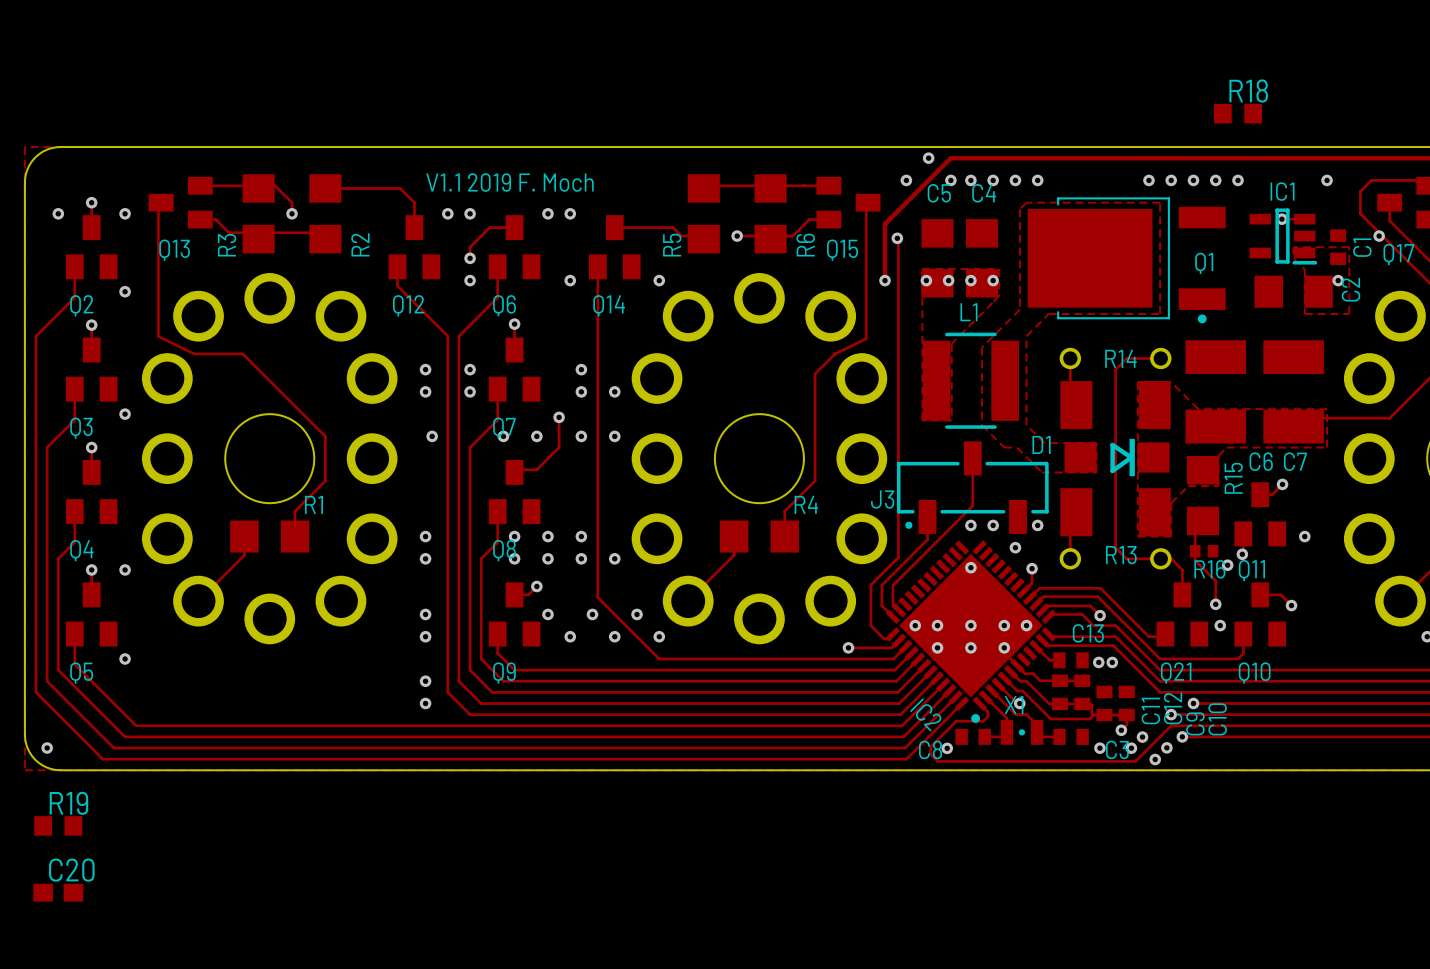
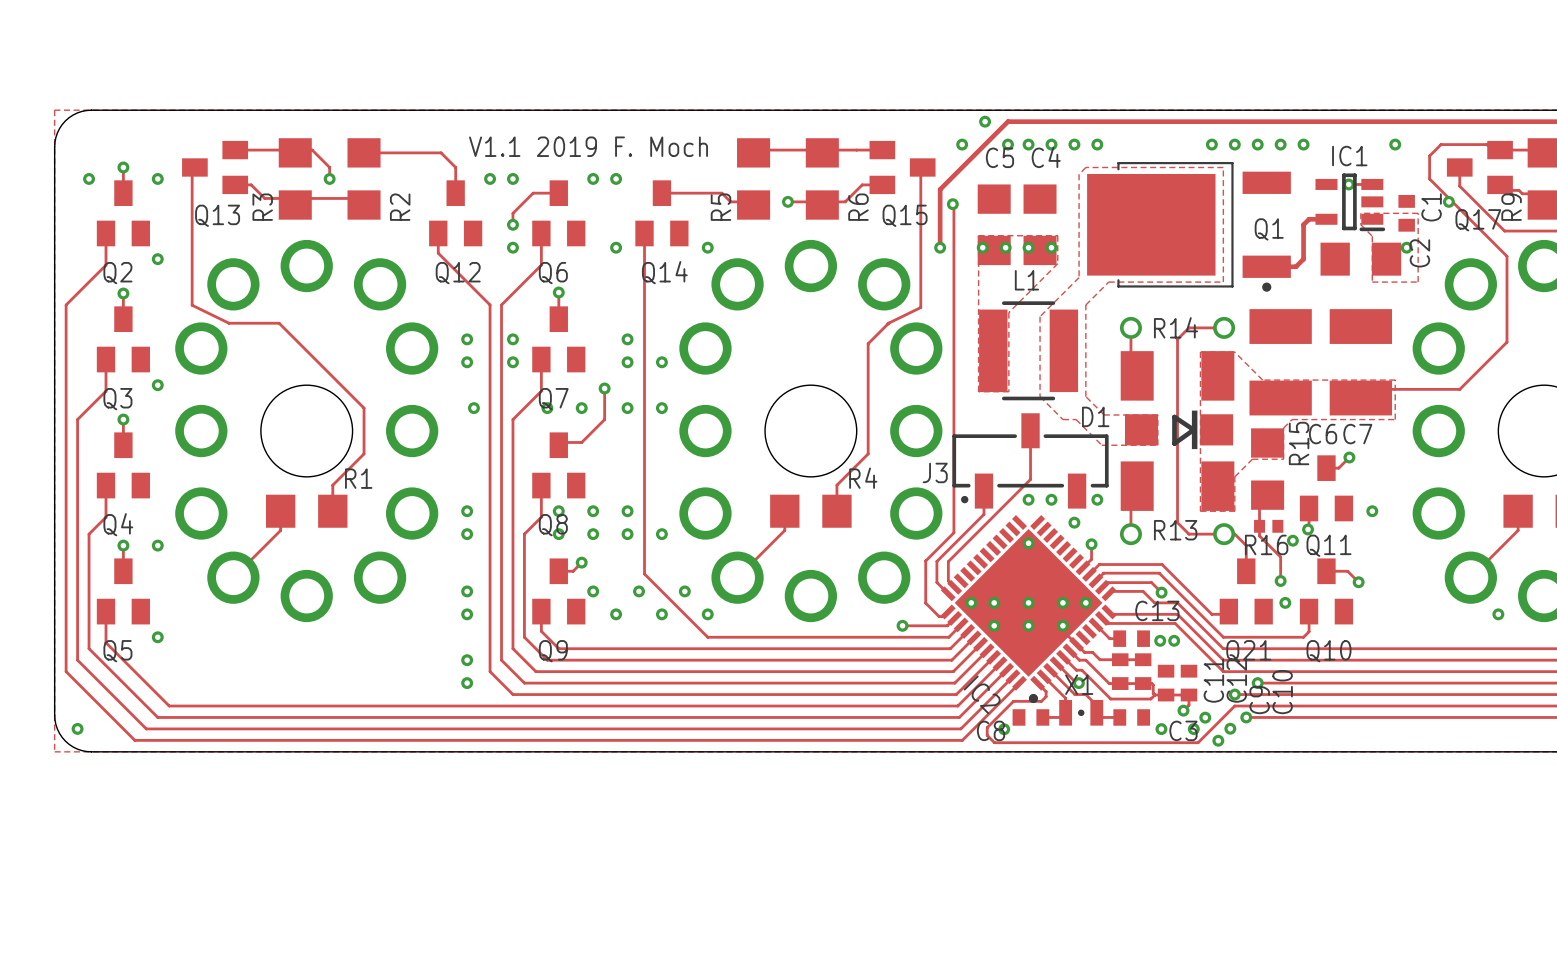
R18: (1238, 113) -> none
track: none -> (1326, 219) (1309, 219) (1303, 224) (1303, 259) (1295, 266) (1266, 266)
R19: (58, 825) -> none
C20: (58, 892) -> none

